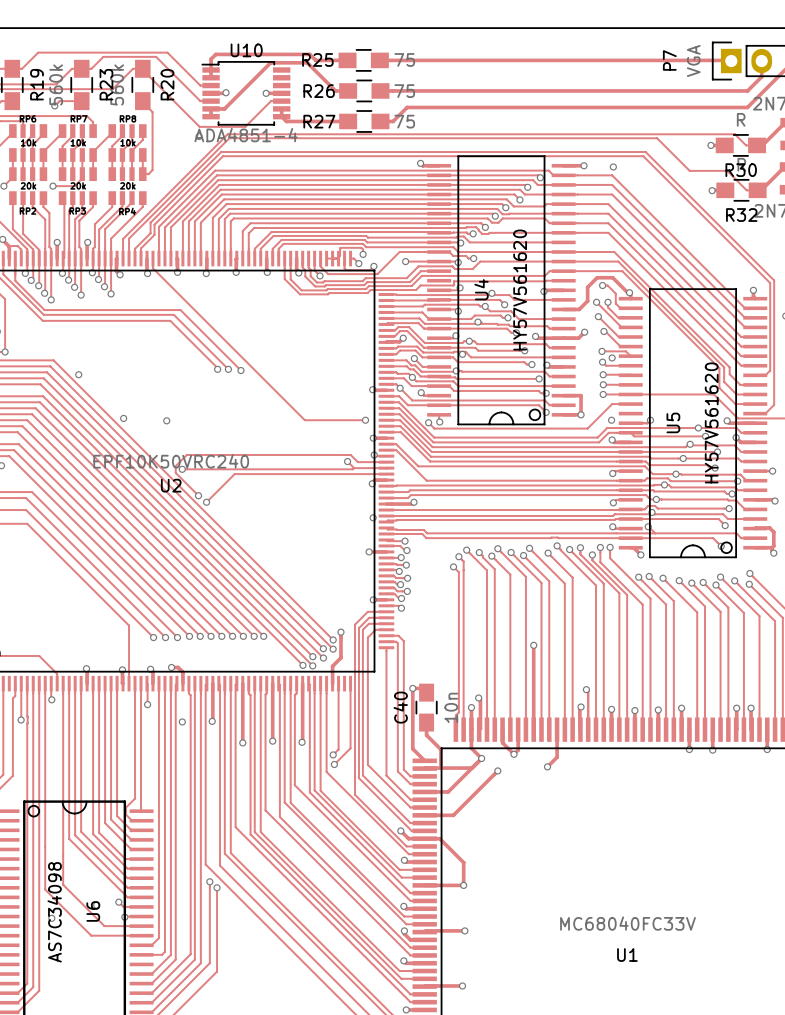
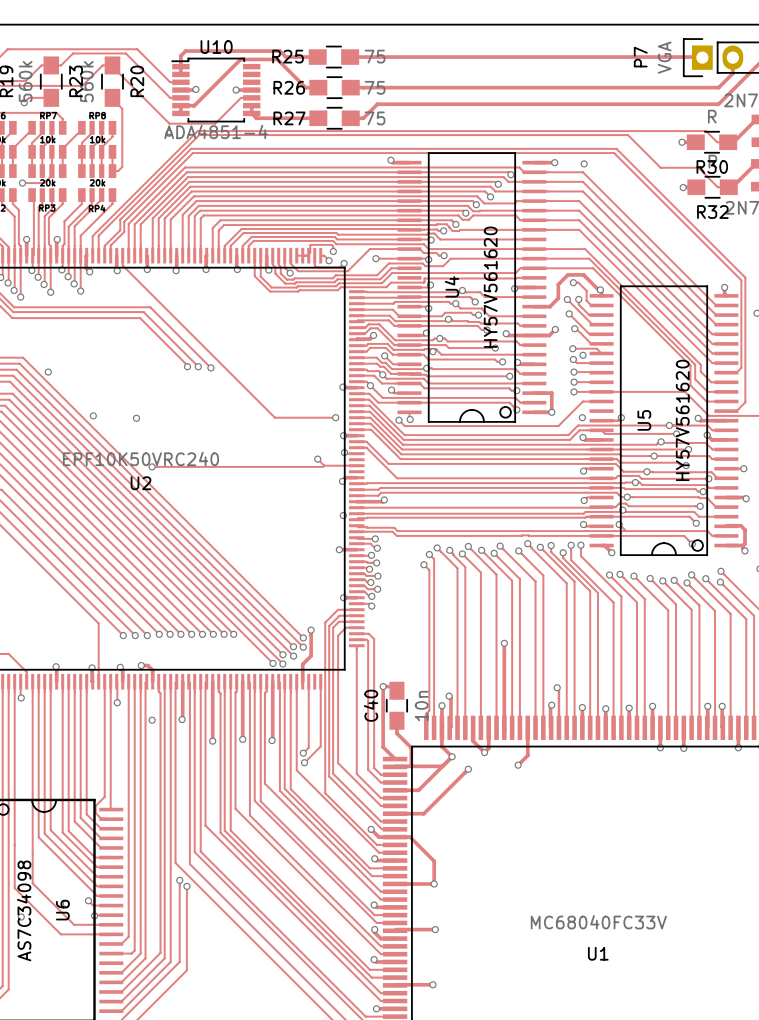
track: (386, 462) (357, 462) (350, 454) (186, 454) (175, 466) (175, 472) (198, 495) -> none
track: (386, 474) (234, 474) (206, 502) -> none
via: (198, 495) -> none
via: (206, 502) -> none

